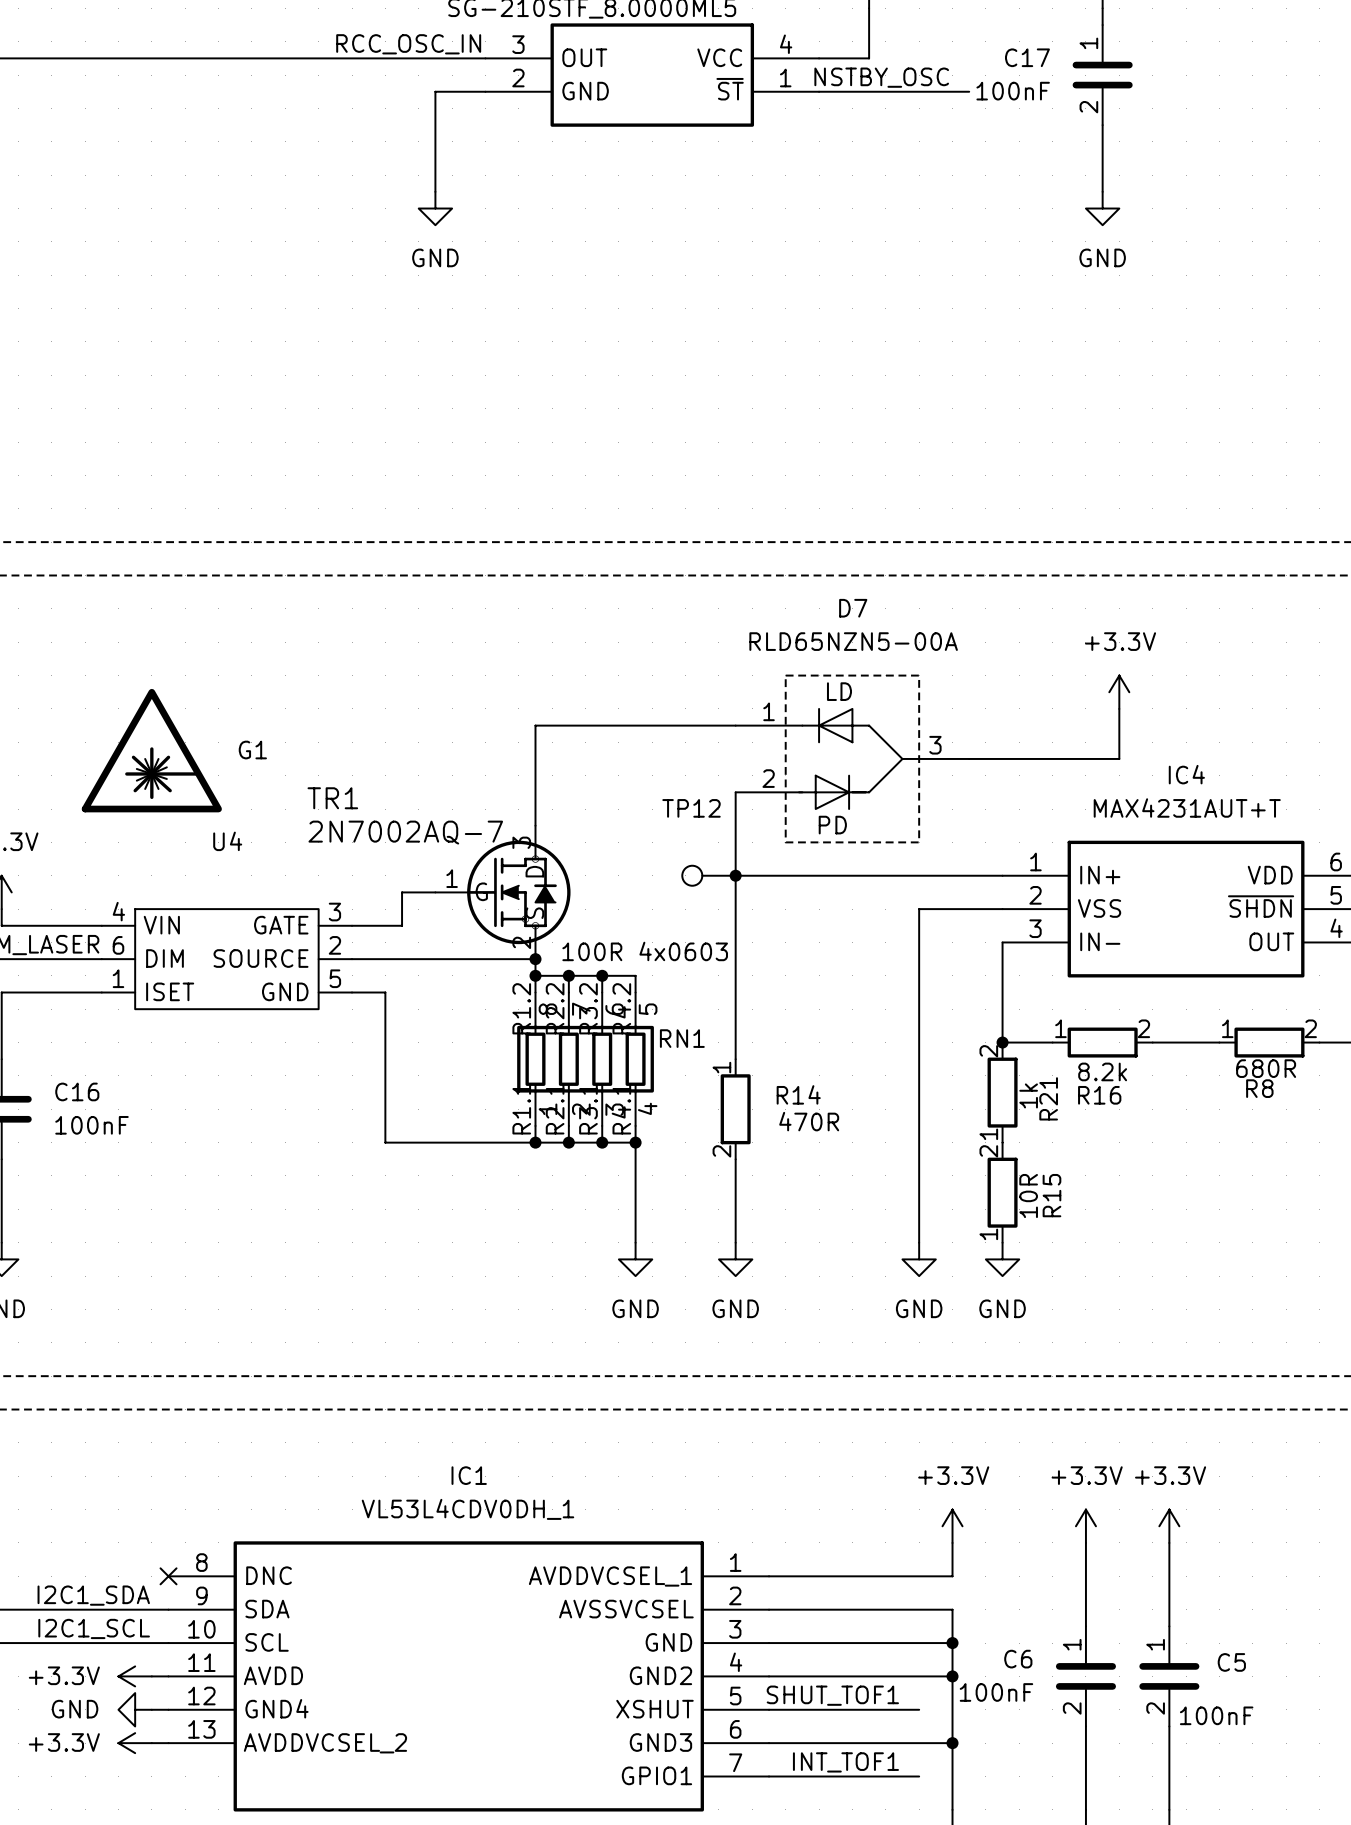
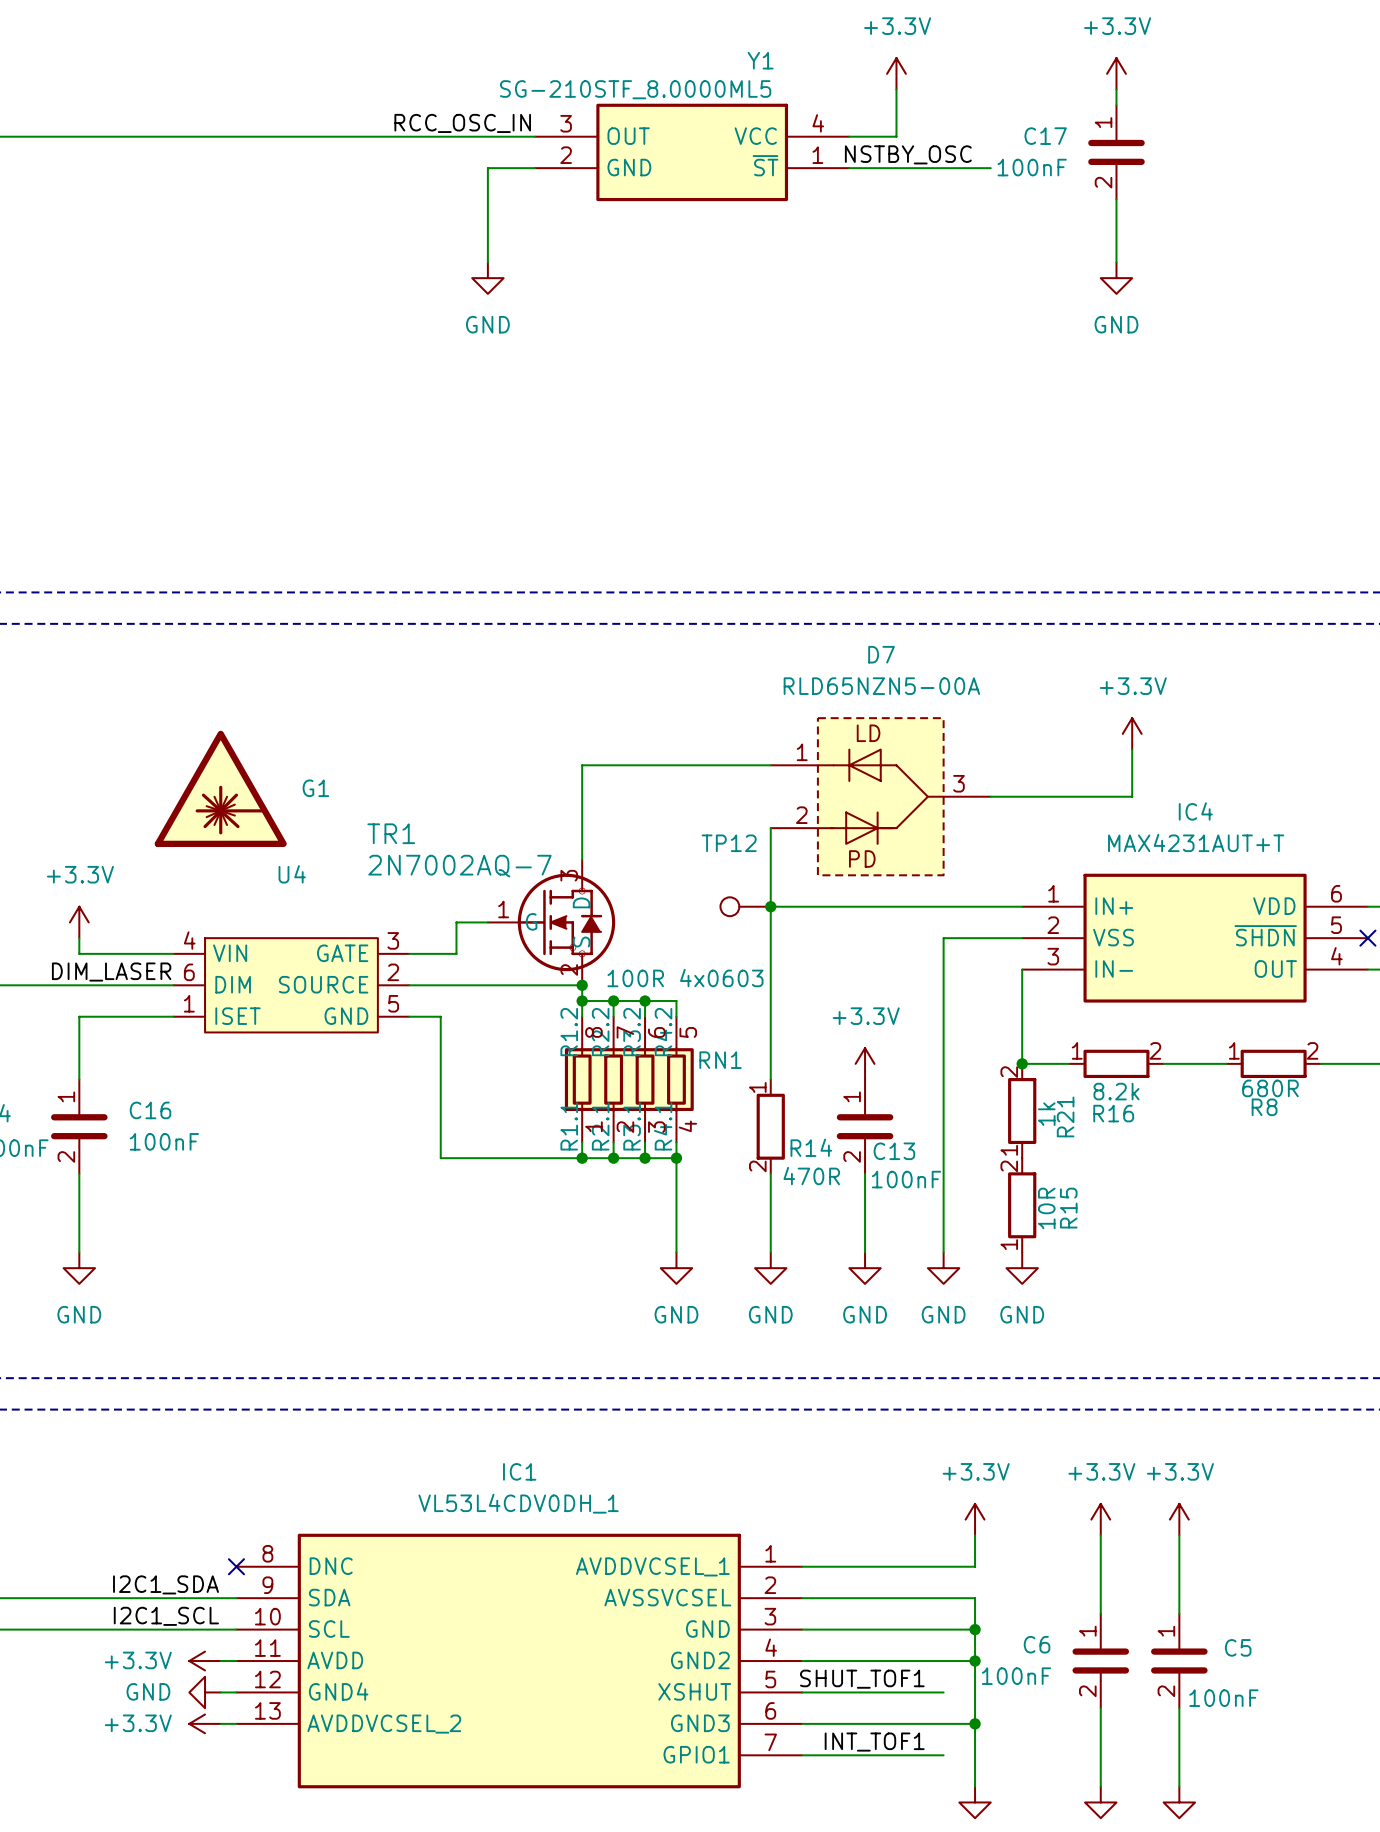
power symbol: none -> +3.3V (865, 1063)
R14 name position: R14 (798, 1094) -> R14 (811, 1147)
C13: none -> 100nF (865, 1126)
R14 value position: 470R (809, 1121) -> 470R (811, 1176)
wire: none -> (865, 1173) (865, 1252)
power symbol: none -> GND (865, 1268)

